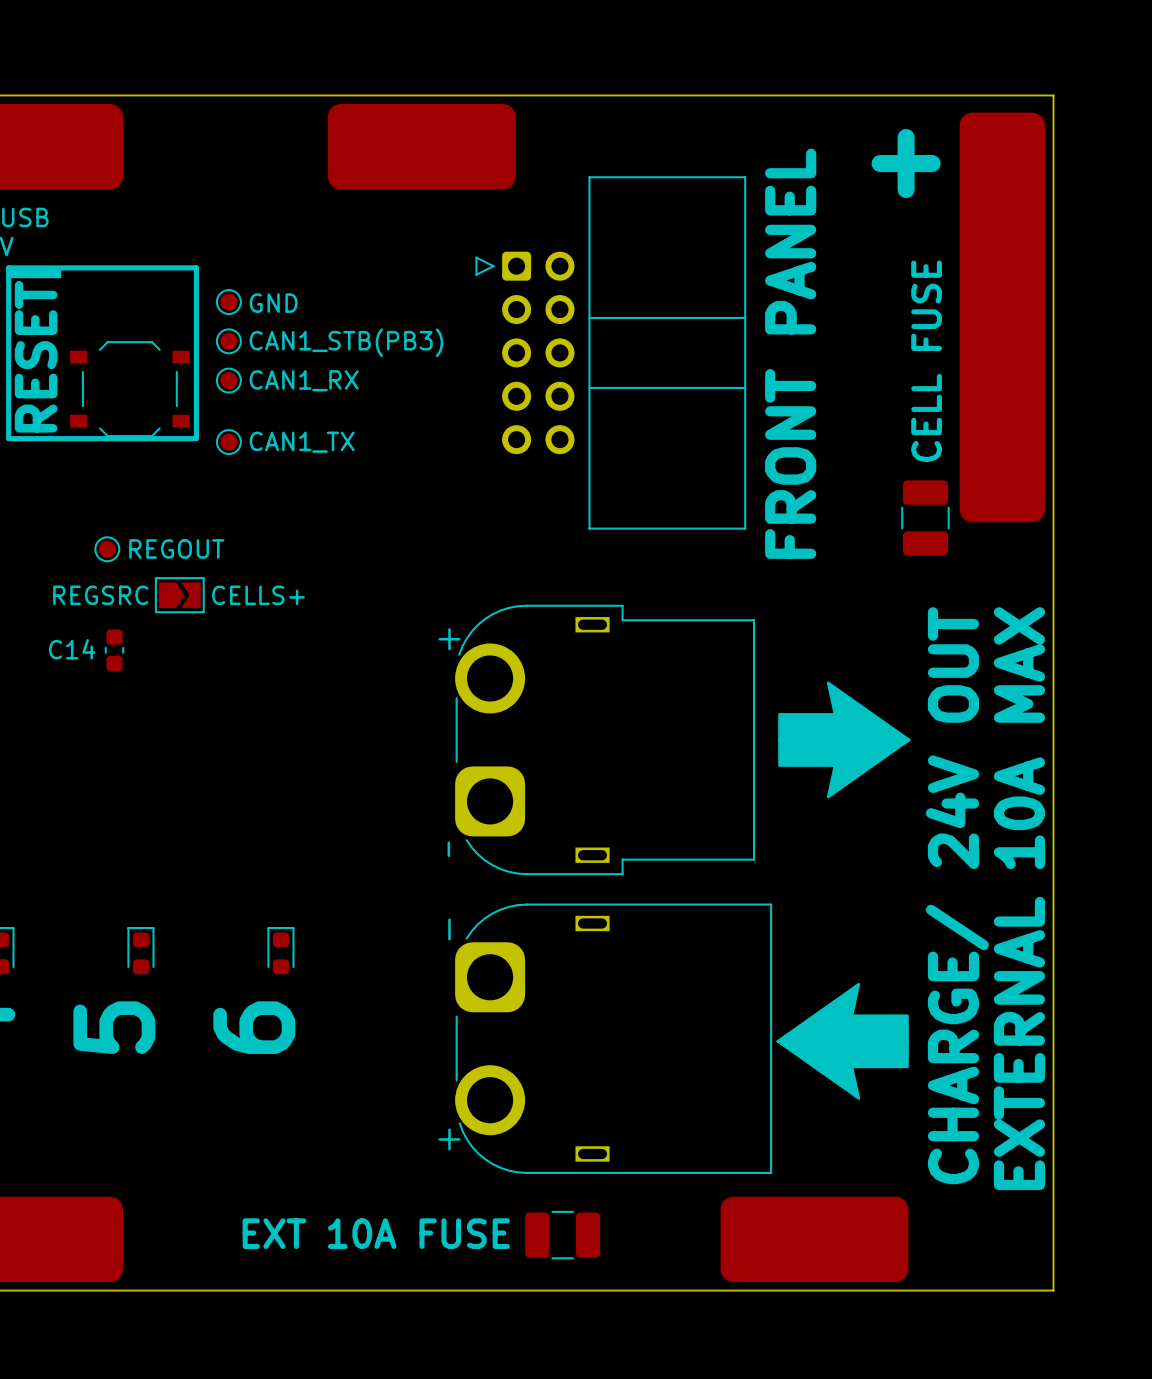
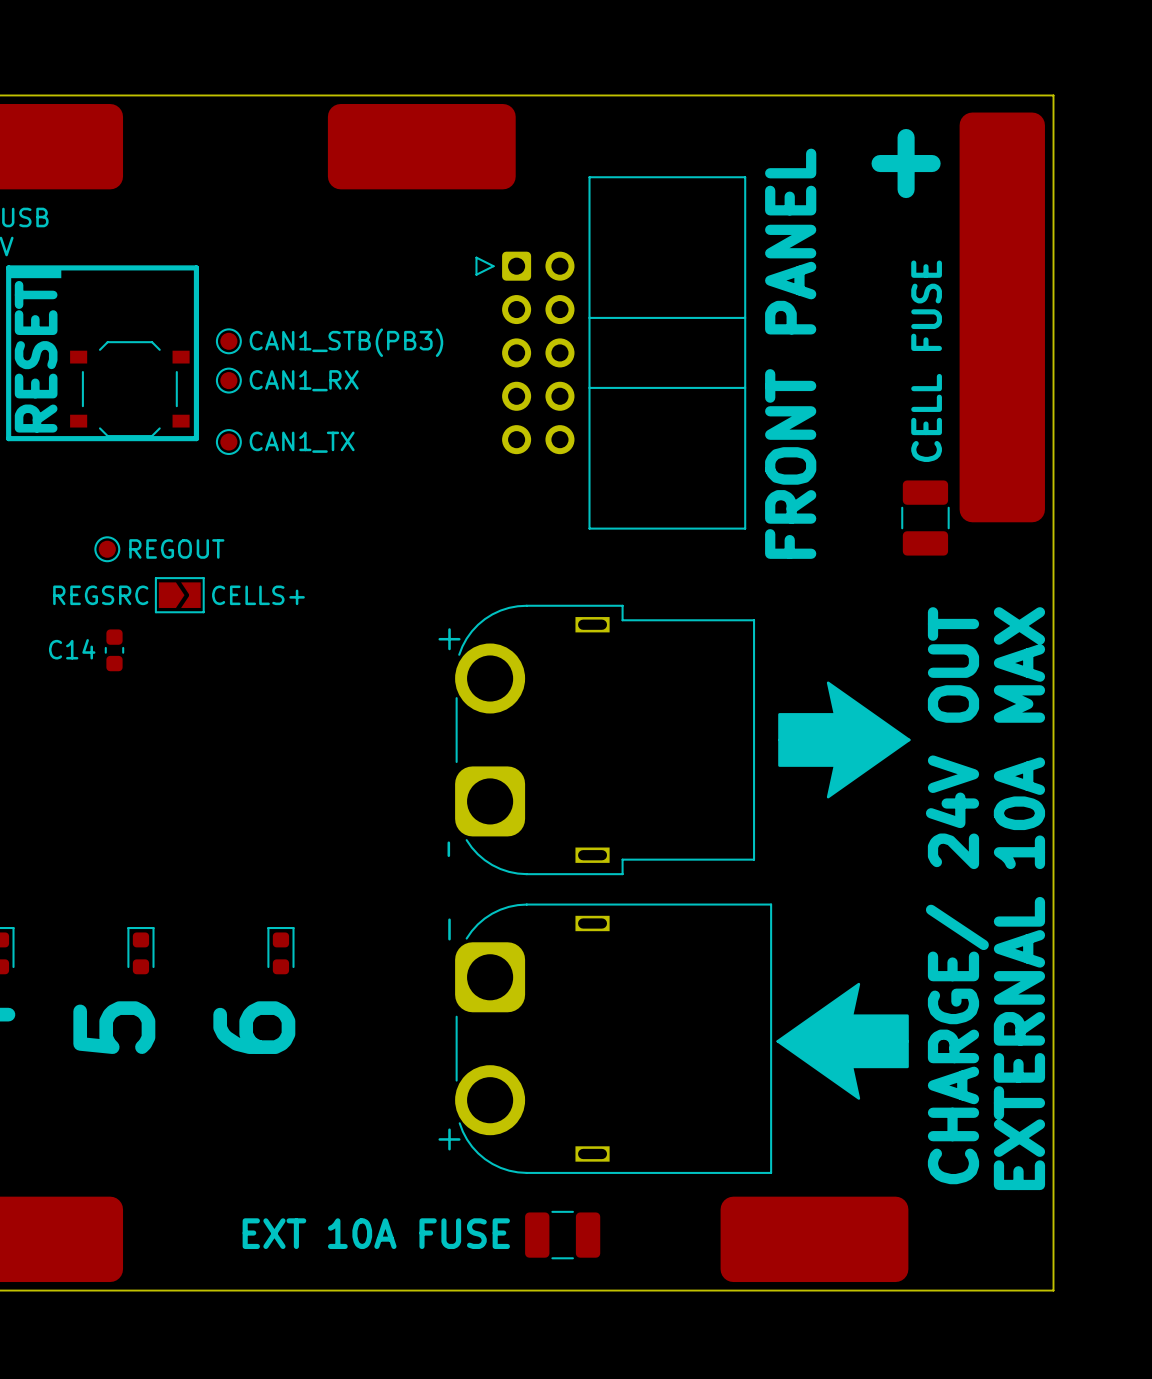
part: (228, 302) -> none
text: GND (273, 303) -> none

